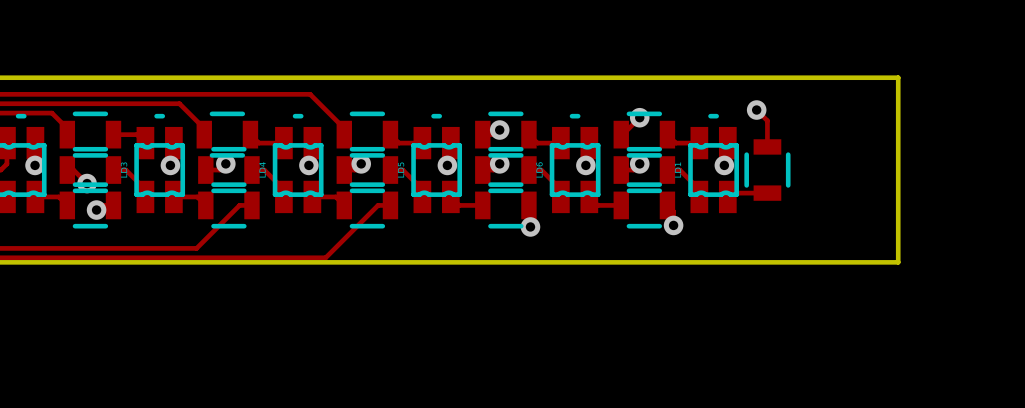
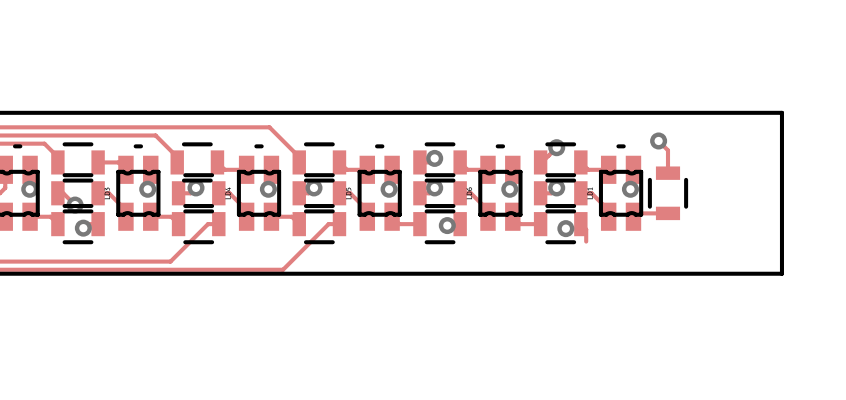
via position: (673, 225) -> (565, 228)
via position: (530, 226) -> (447, 225)

